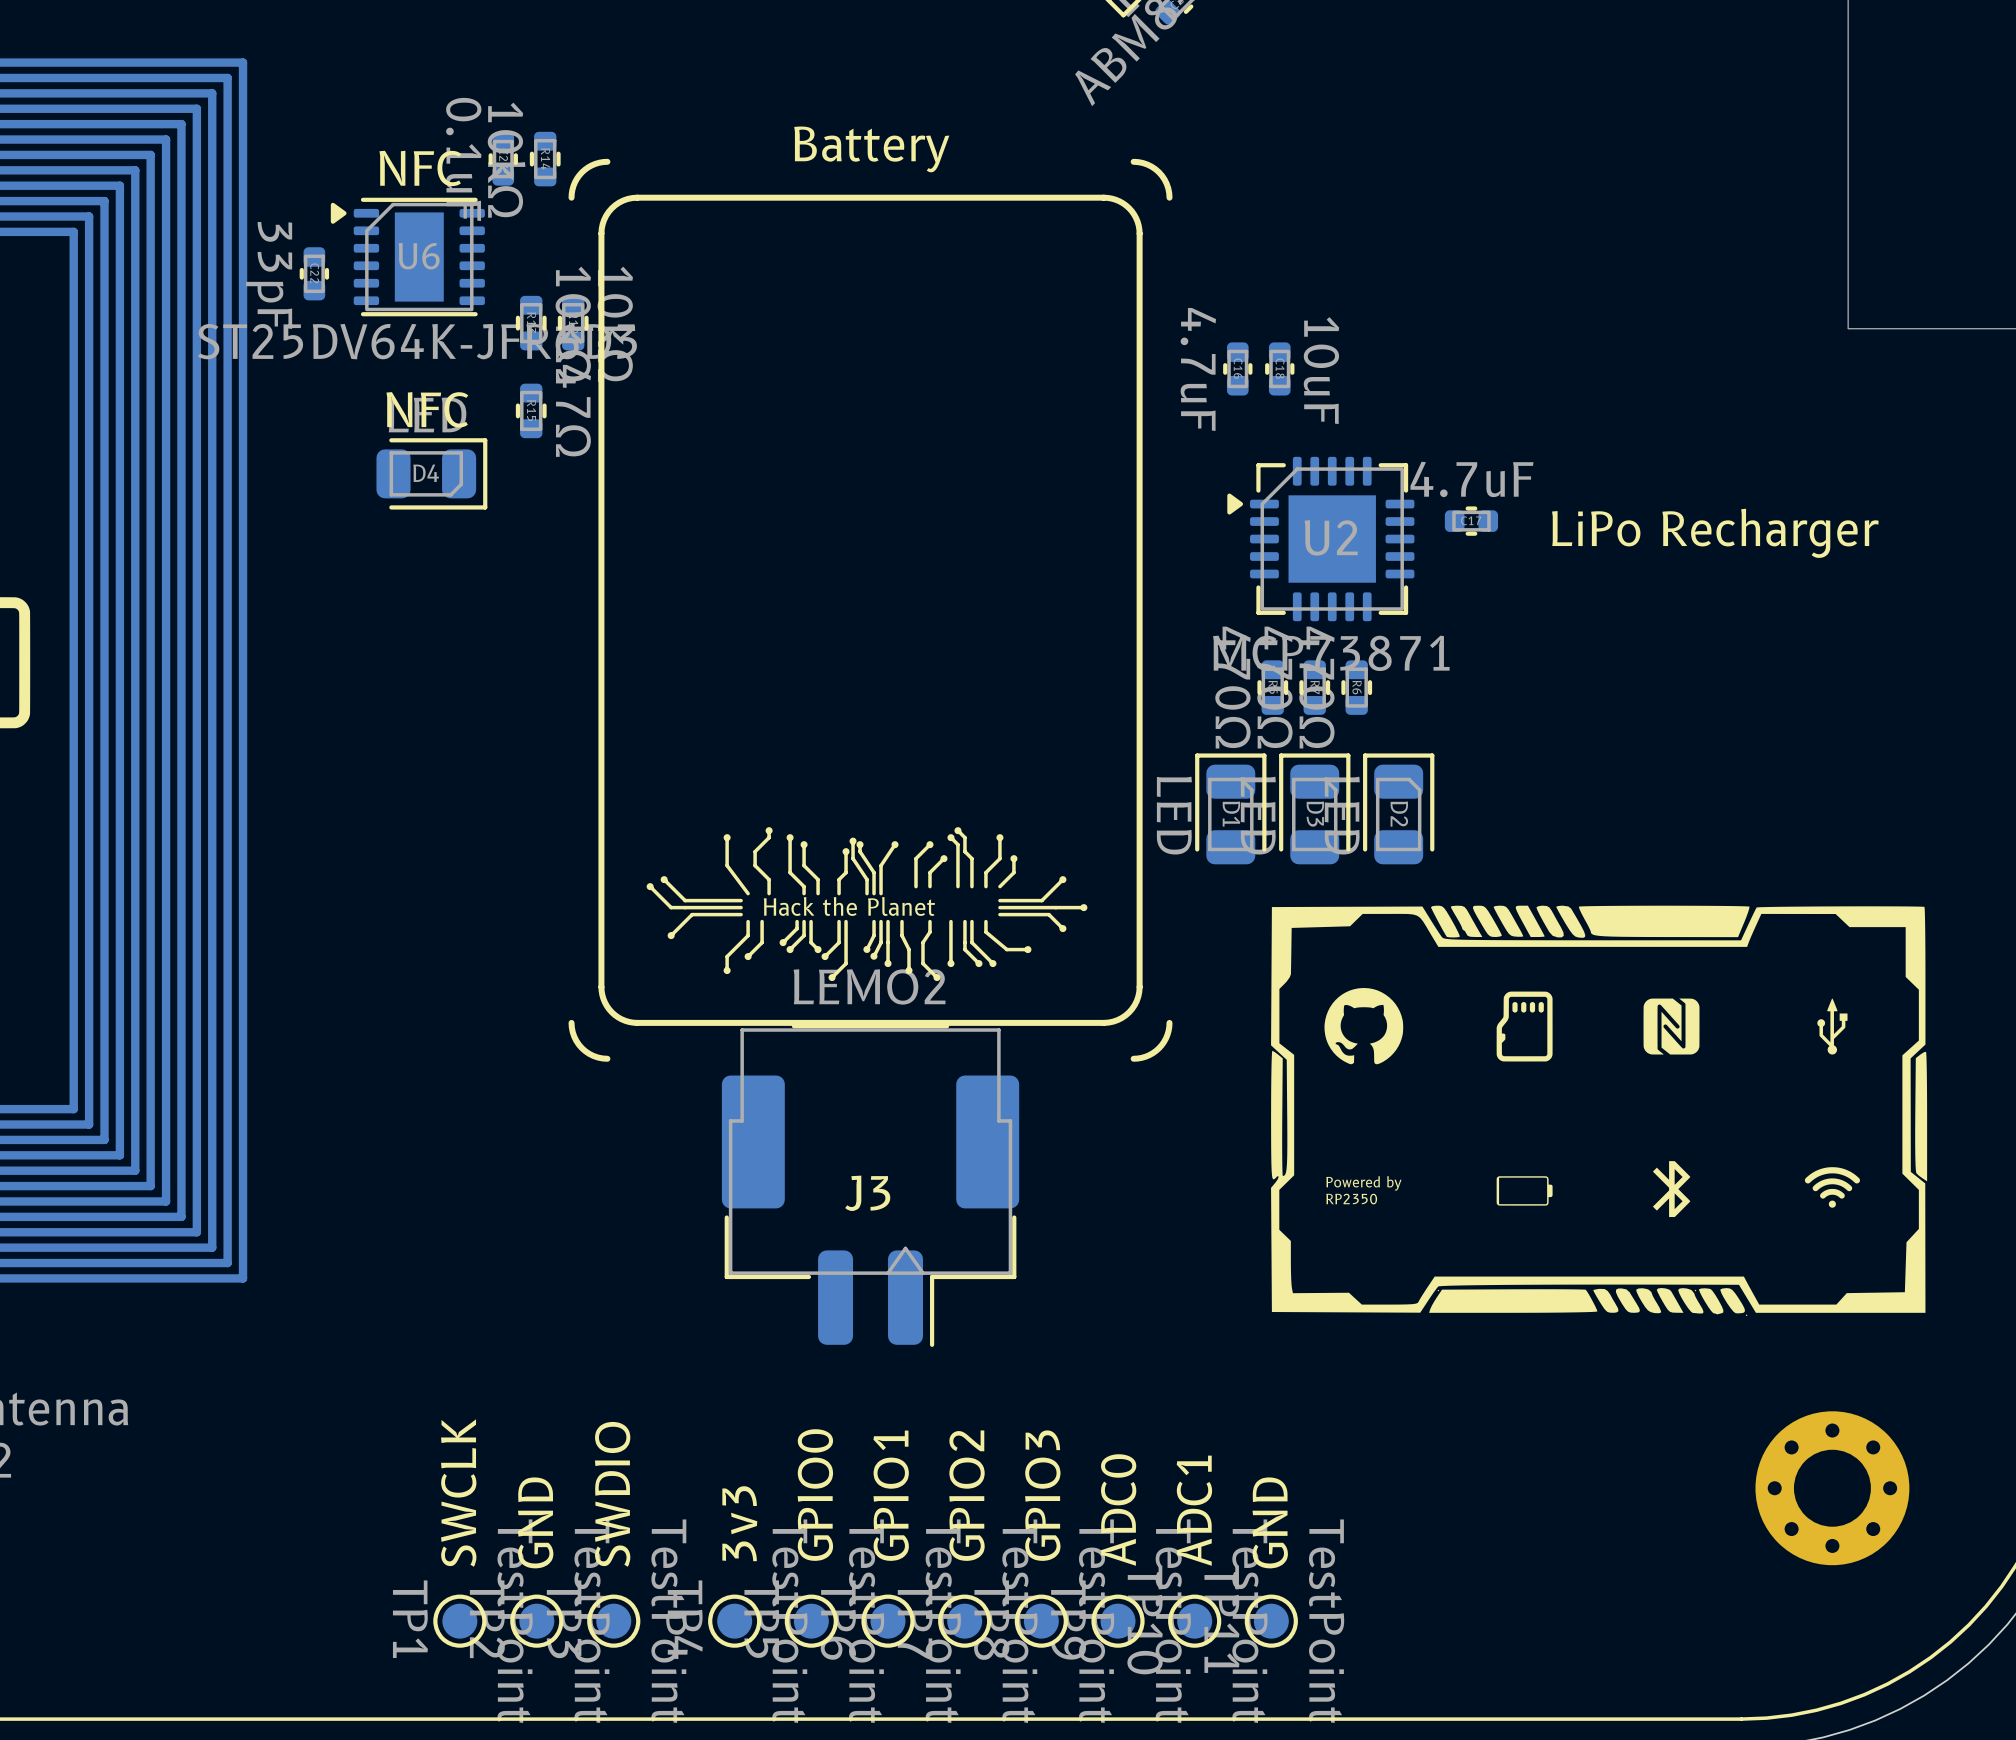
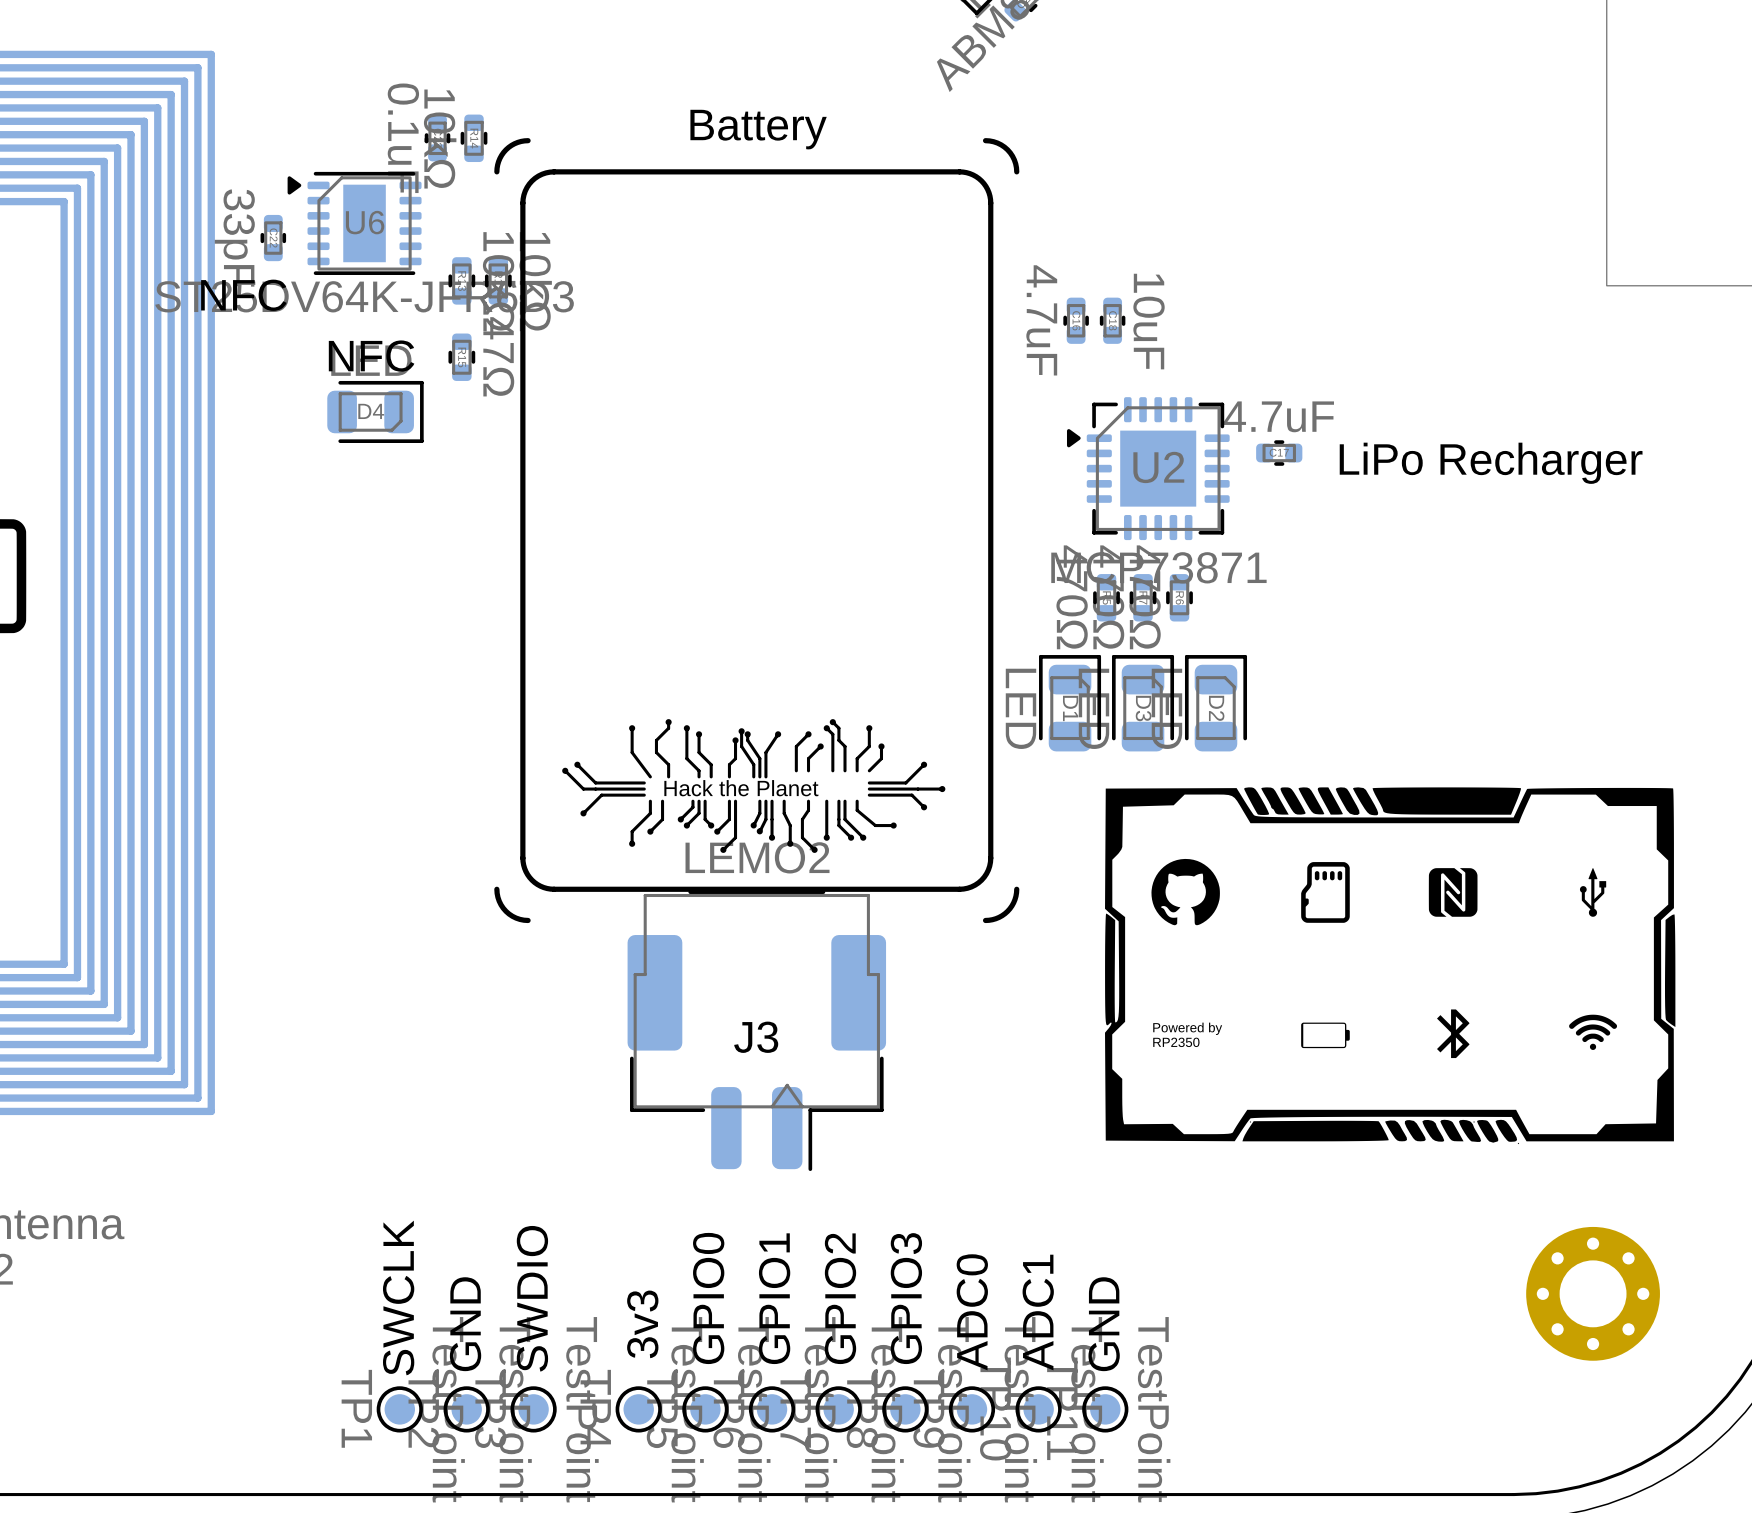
text position: NFC (420, 168) -> NFC (243, 295)

